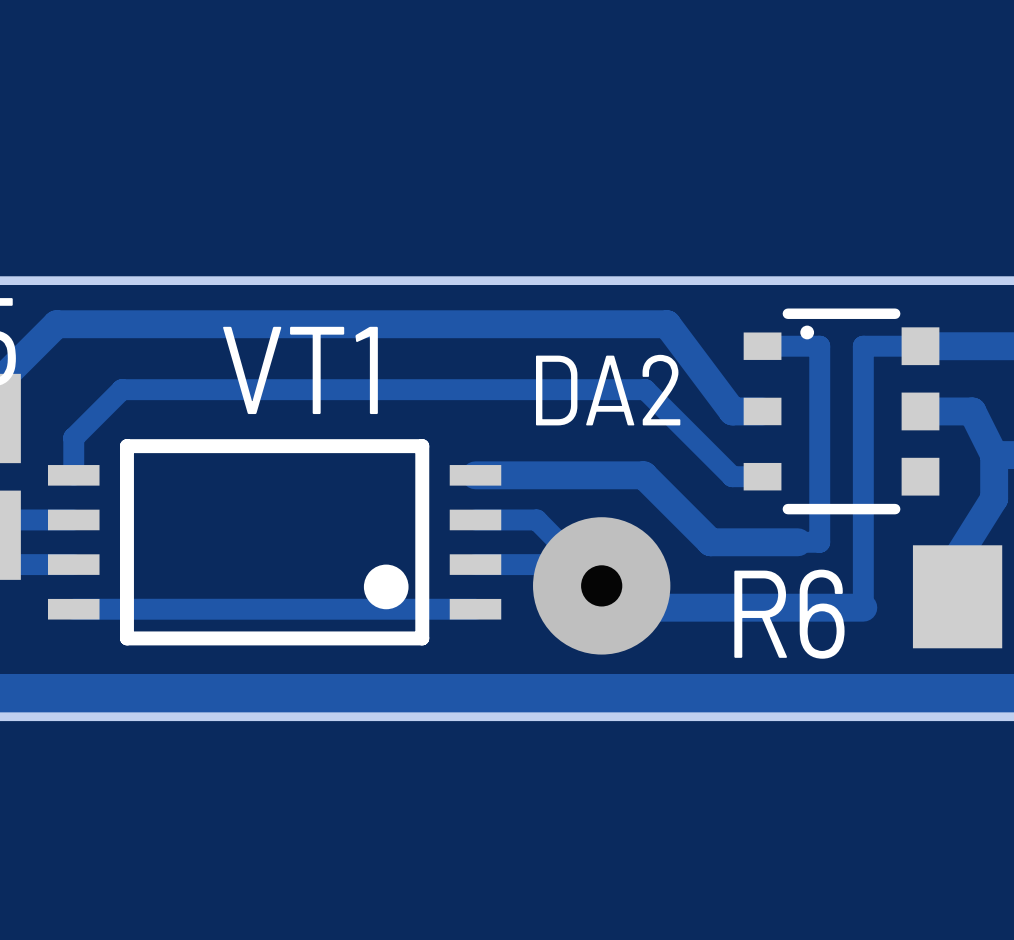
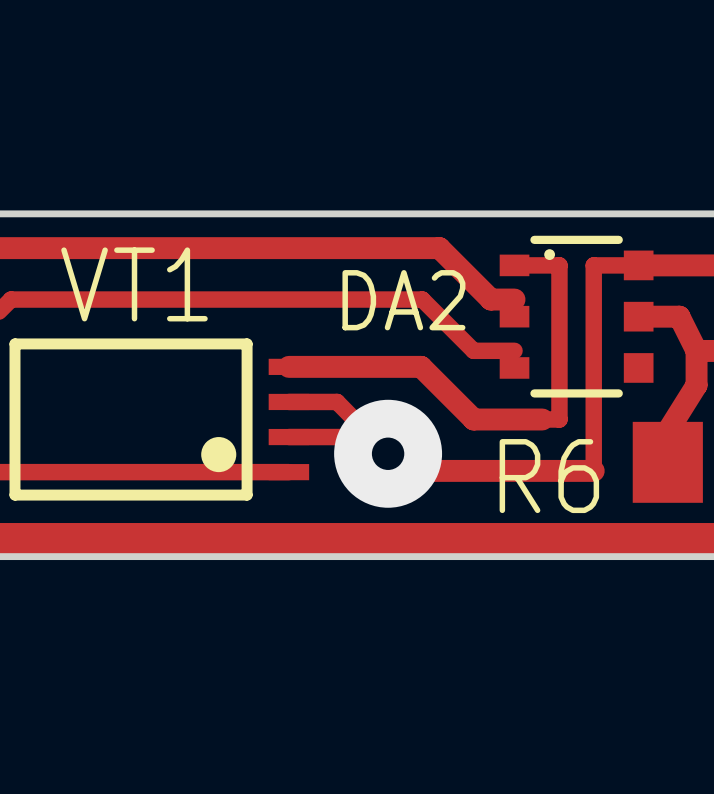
track: (667, 324) (732, 411) (762, 411) -> (439, 248) (490, 299) (514, 299)
track: (710, 454) (732, 476) (762, 476) -> (473, 350) (514, 350)

